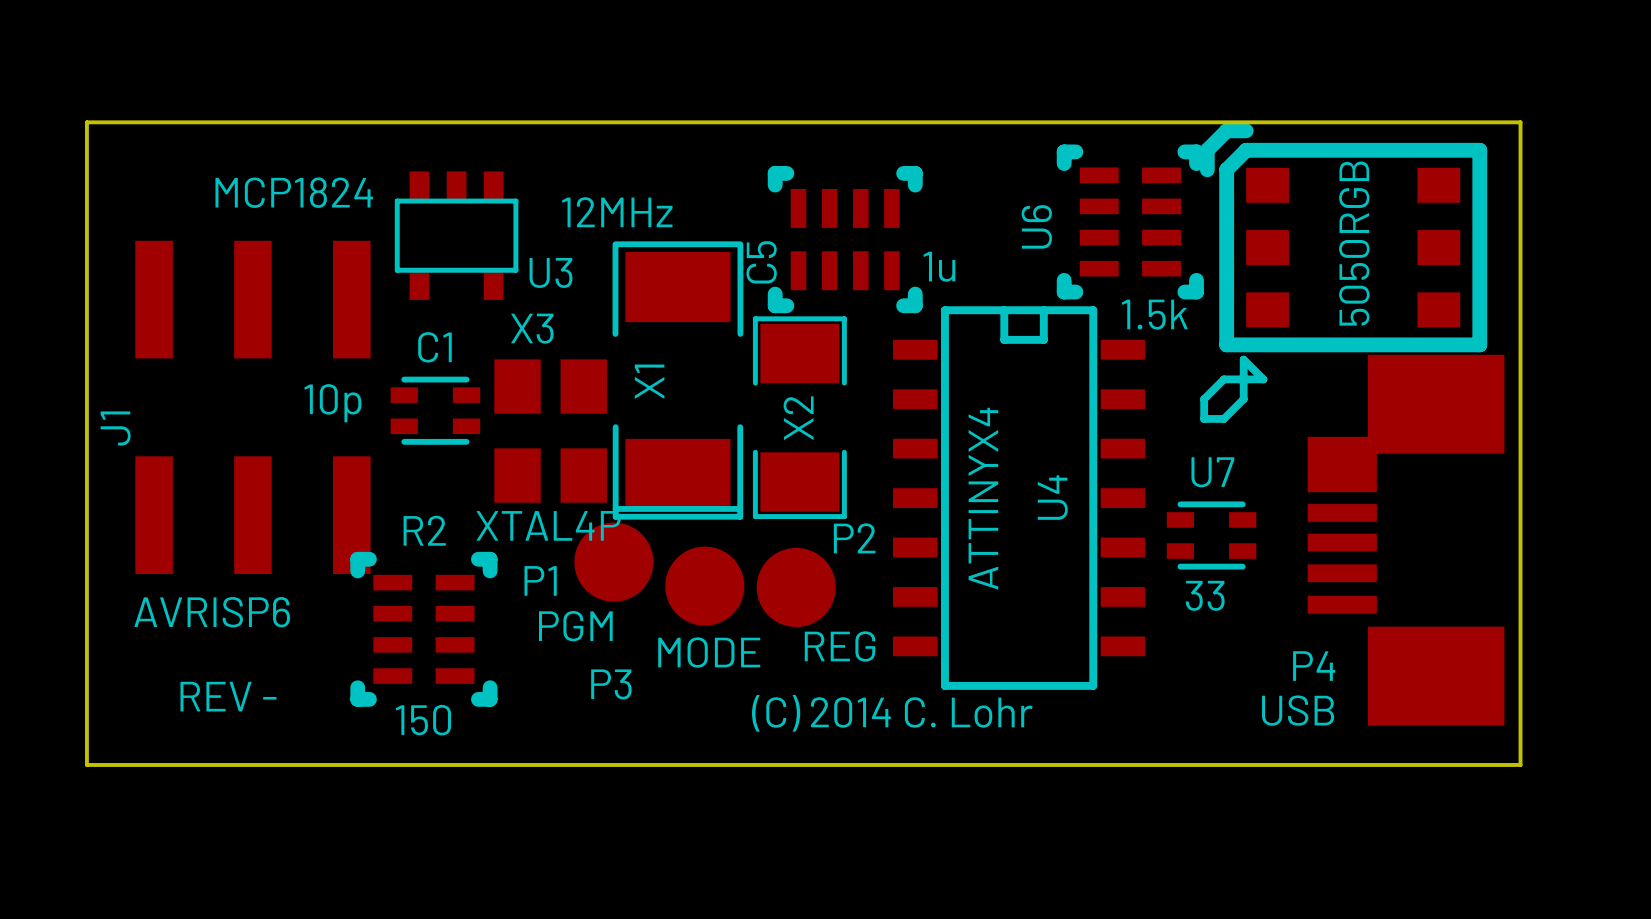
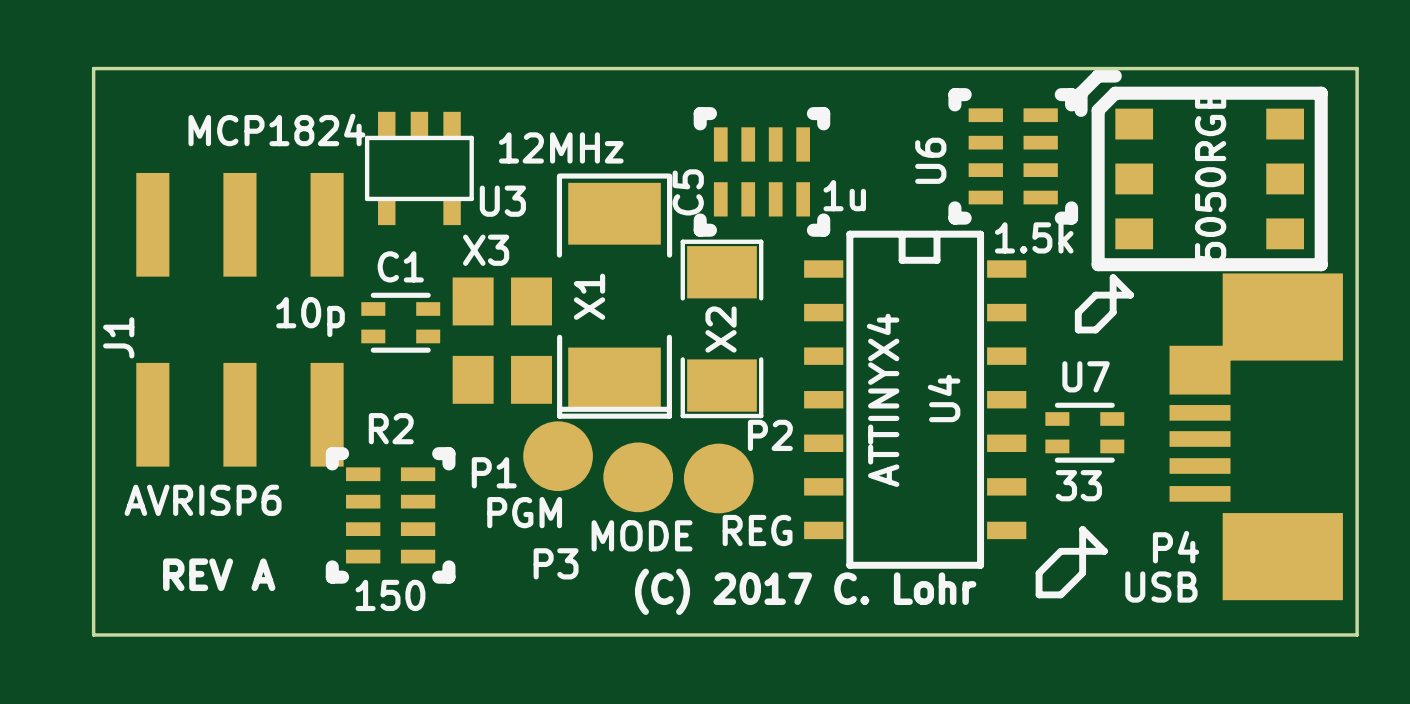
X3 value: XTAL4P (548, 525) -> none
line: none -> (1082, 529) (1082, 573) (1060, 594) (1039, 594) (1039, 573) (1060, 551) (1104, 551) (1082, 529)
text: REV - (228, 696) -> REV A (219, 574)
text: (C) 2014 C. Lohr (892, 713) -> (C) 2017 C. Lohr (805, 591)

